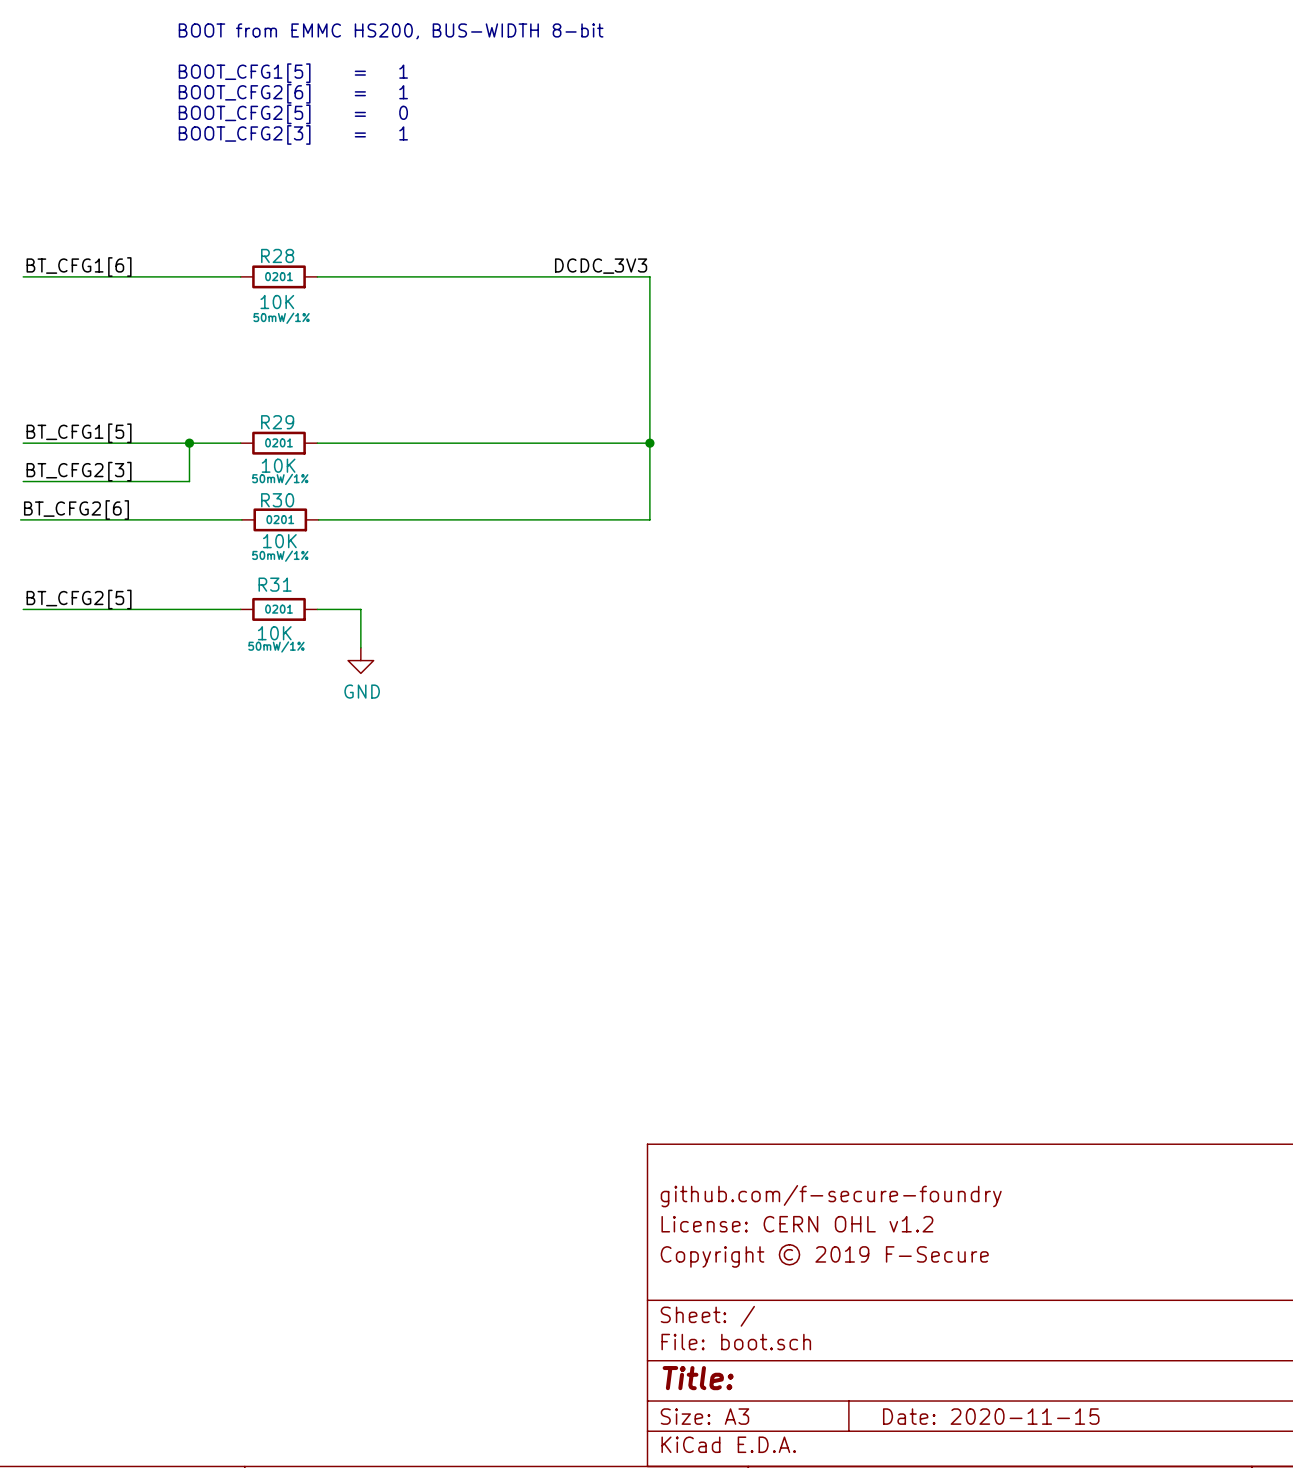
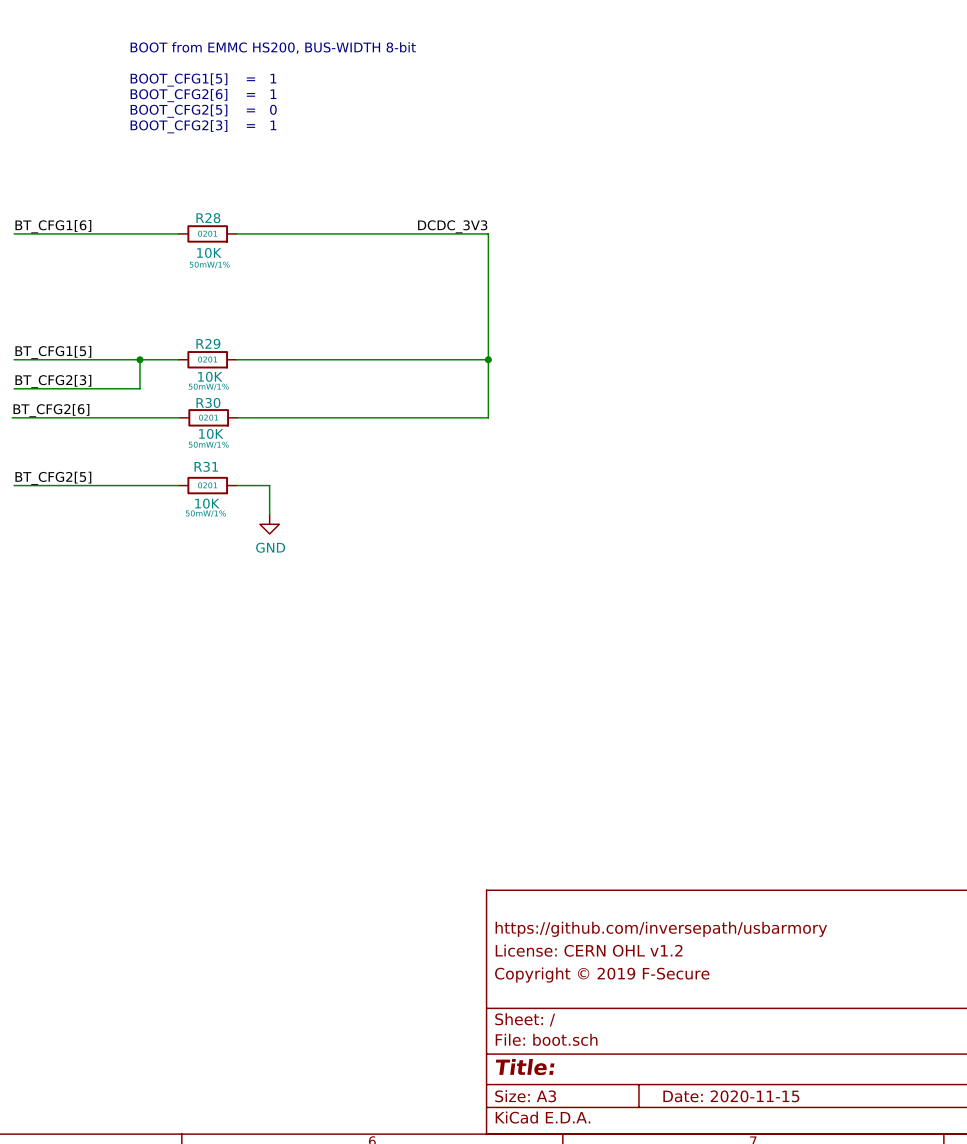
title block: github.com/f-secure-foundry (831, 1196) -> https://github.com/inversepath/usbarmory (661, 929)

